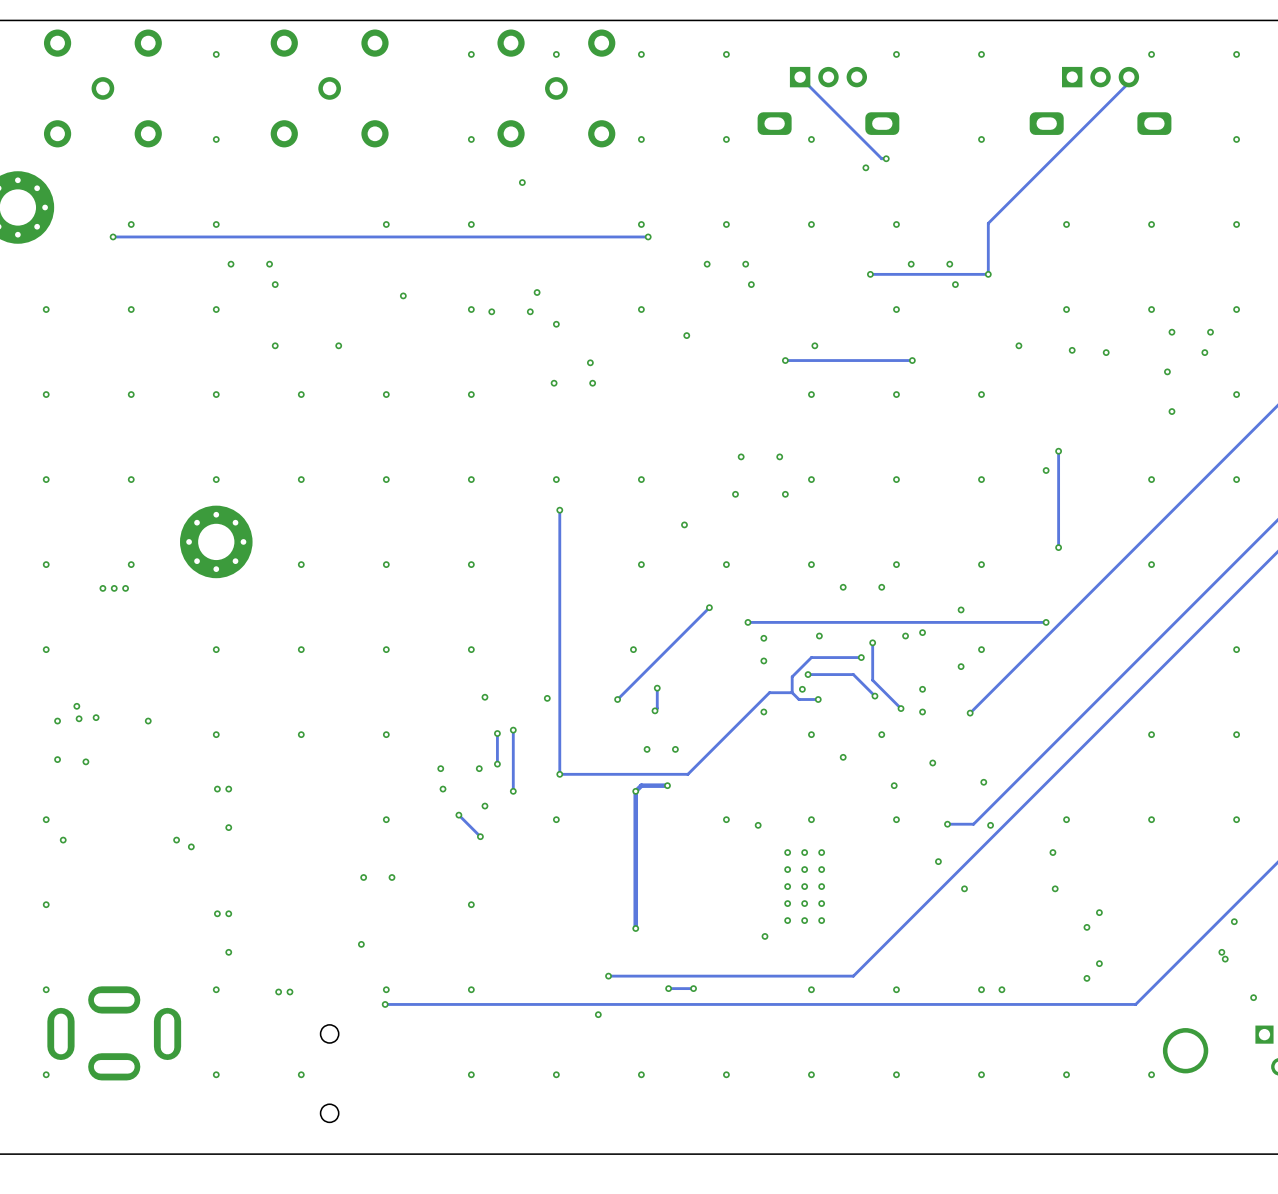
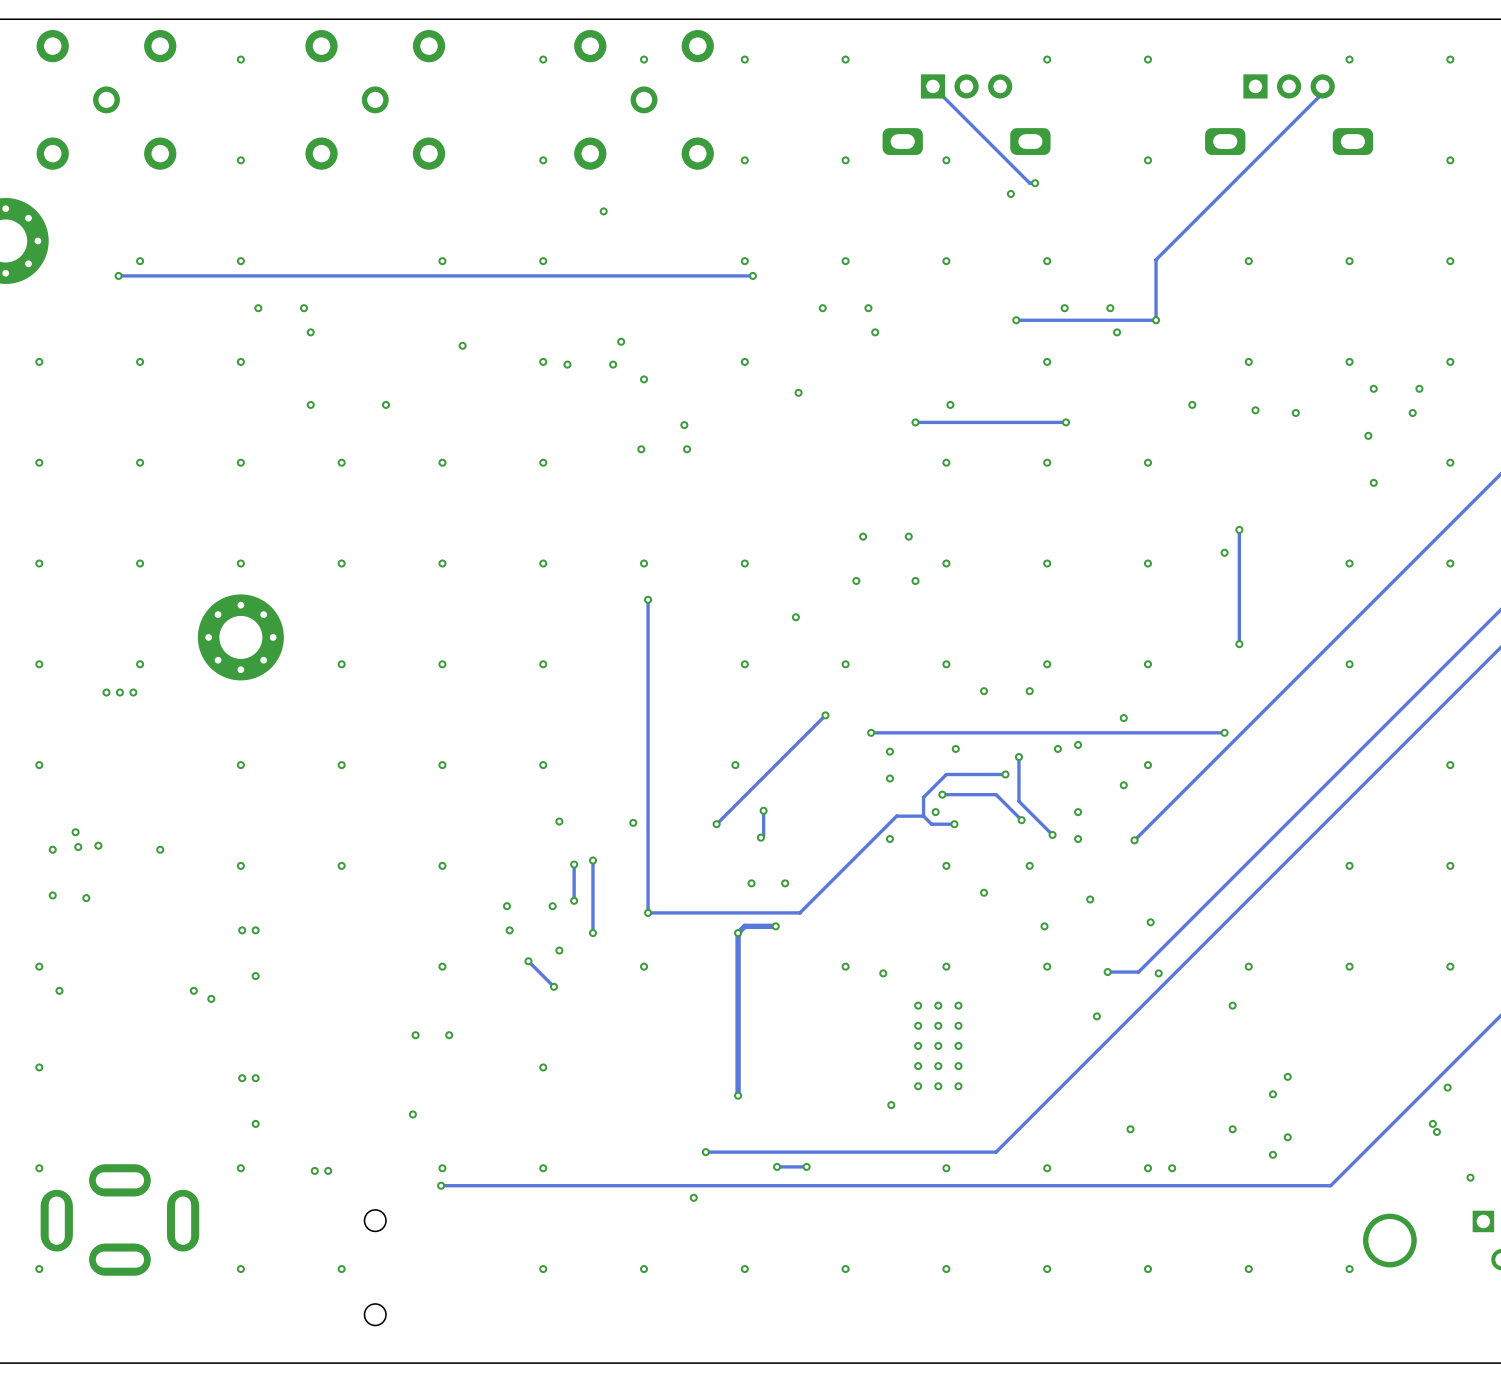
via: (964, 888) -> none
via: (1055, 888) -> none
via: none -> (1130, 1129)
via: none -> (1232, 1129)

